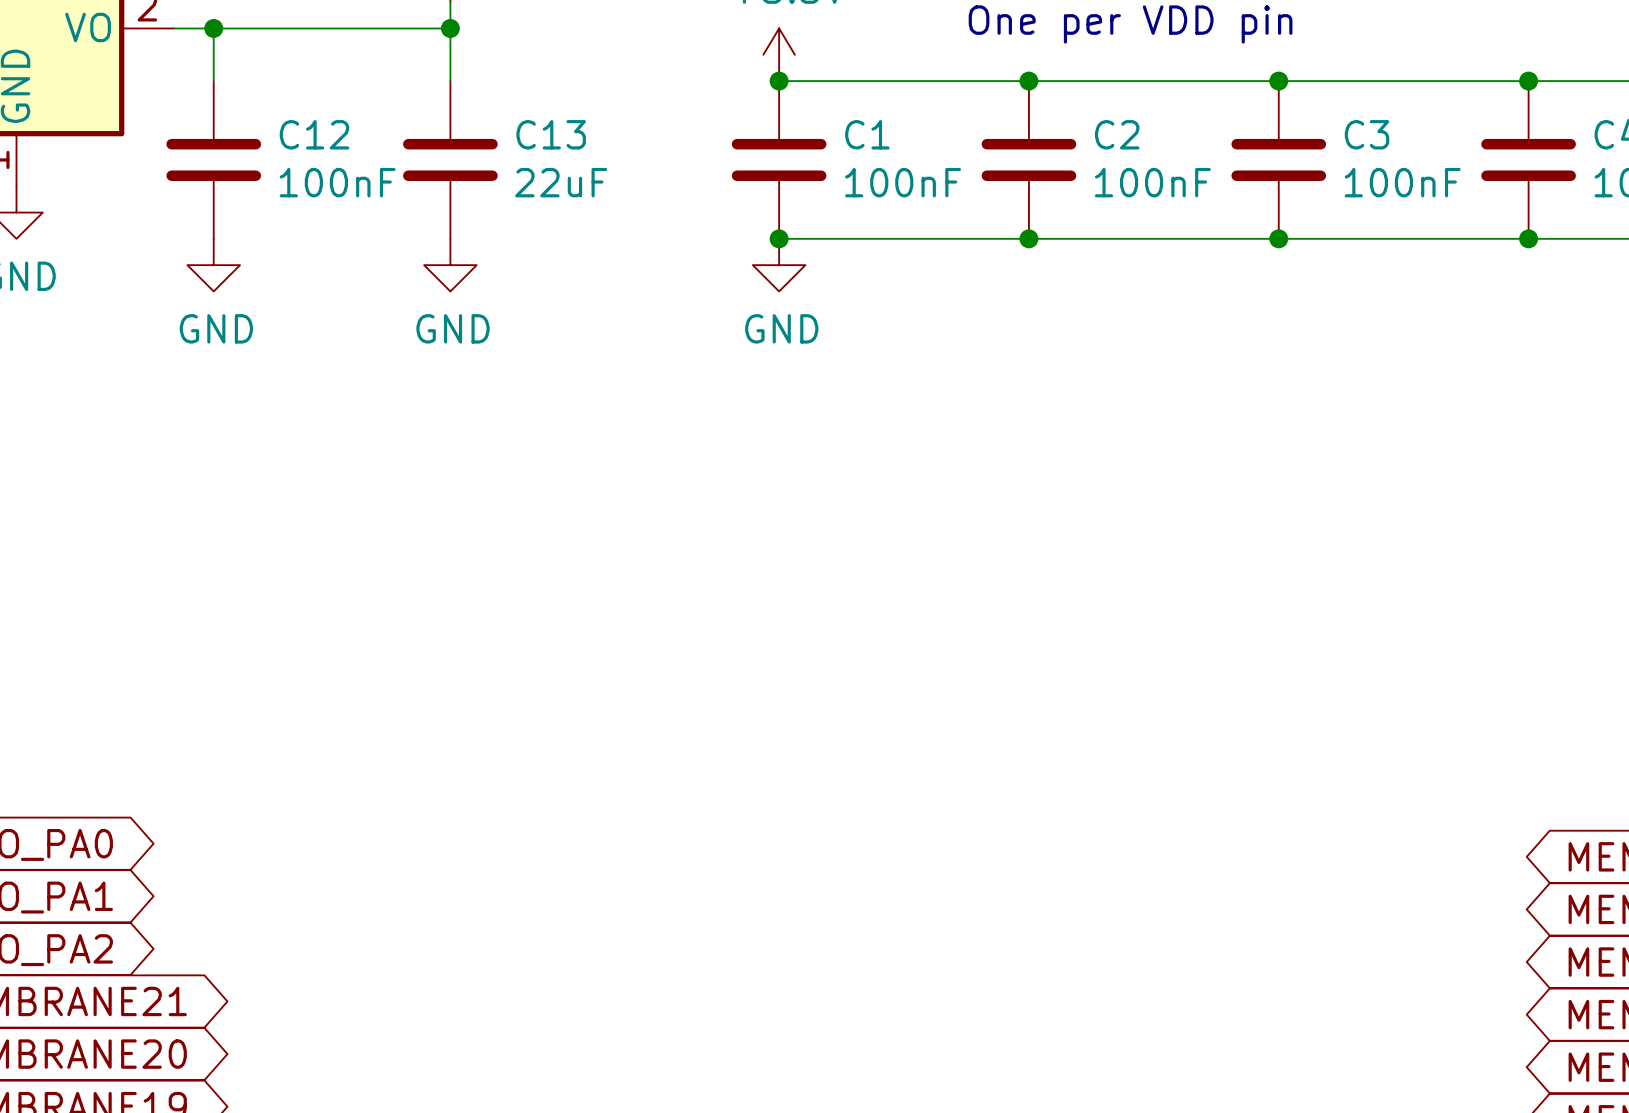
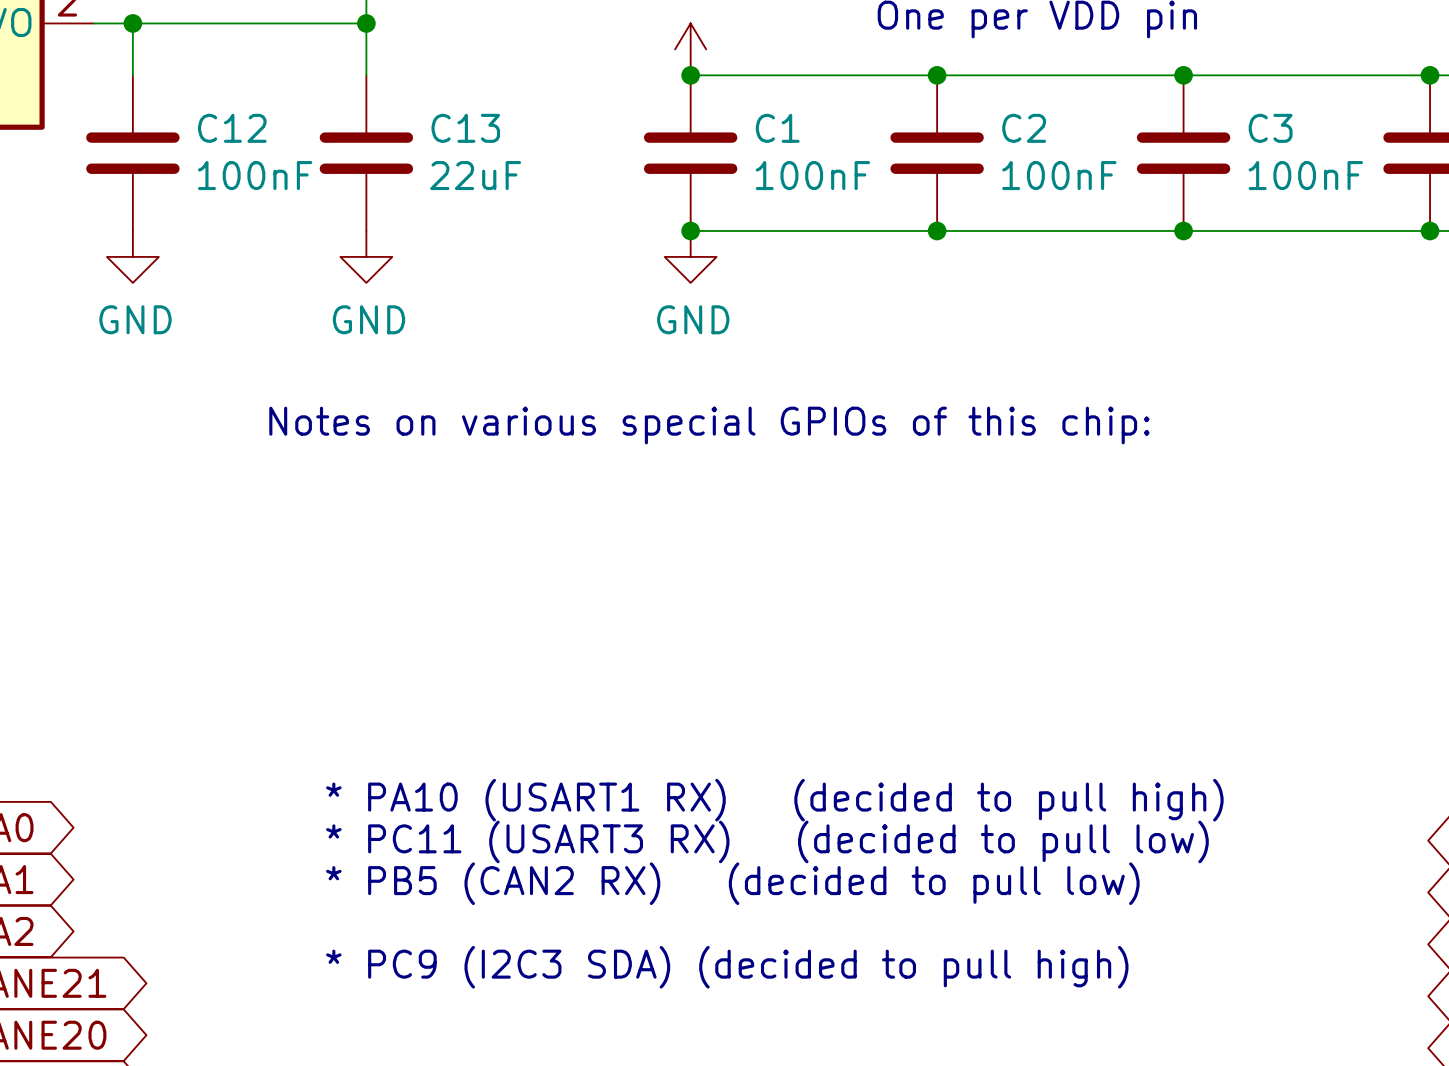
text: none -> Notes on various special GPIOs of this chip: (709, 425)
text: none -> * PA10 (USART1 RX) (decided to pull high) (774, 800)
text: none -> * PC11 (USART3 RX) (decided to pull low) (767, 841)
text: none -> * PB5 (CAN2 RX) (decided to pull low) (732, 883)
text: none -> * PC9 (I2C3 SDA) (decided to pull high) (727, 967)

